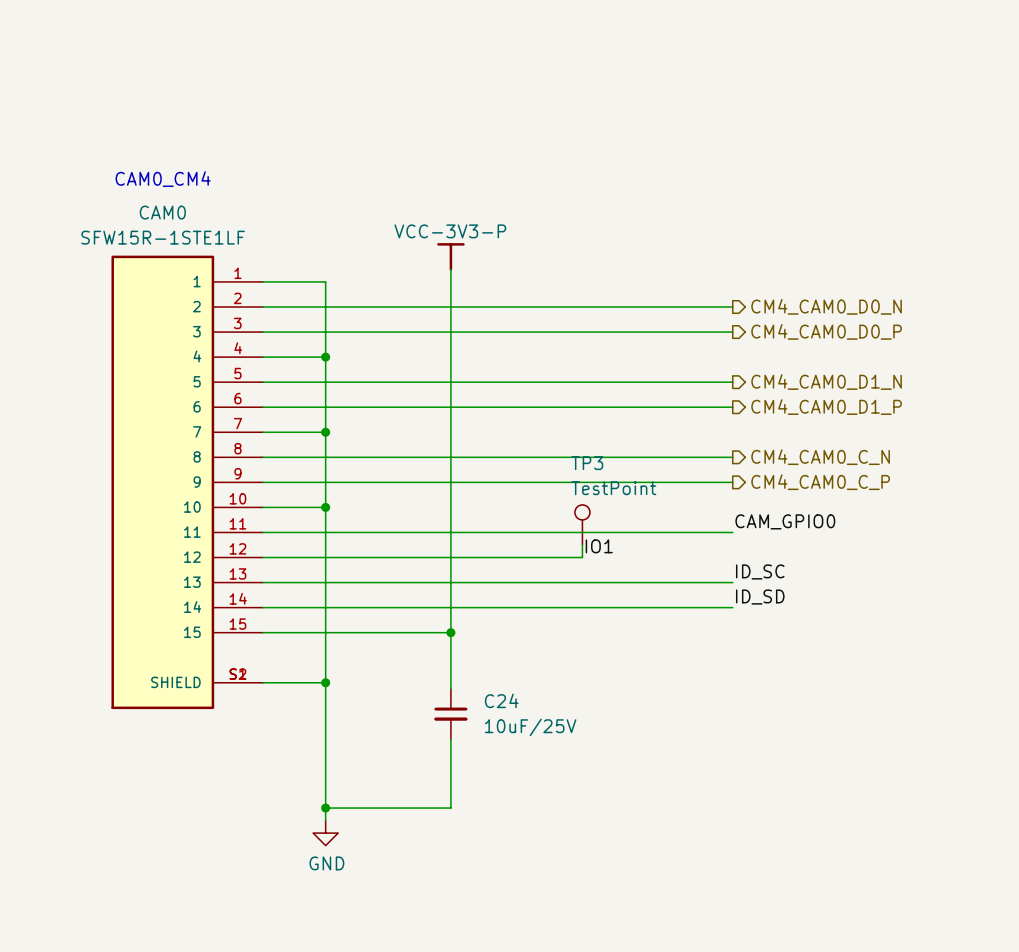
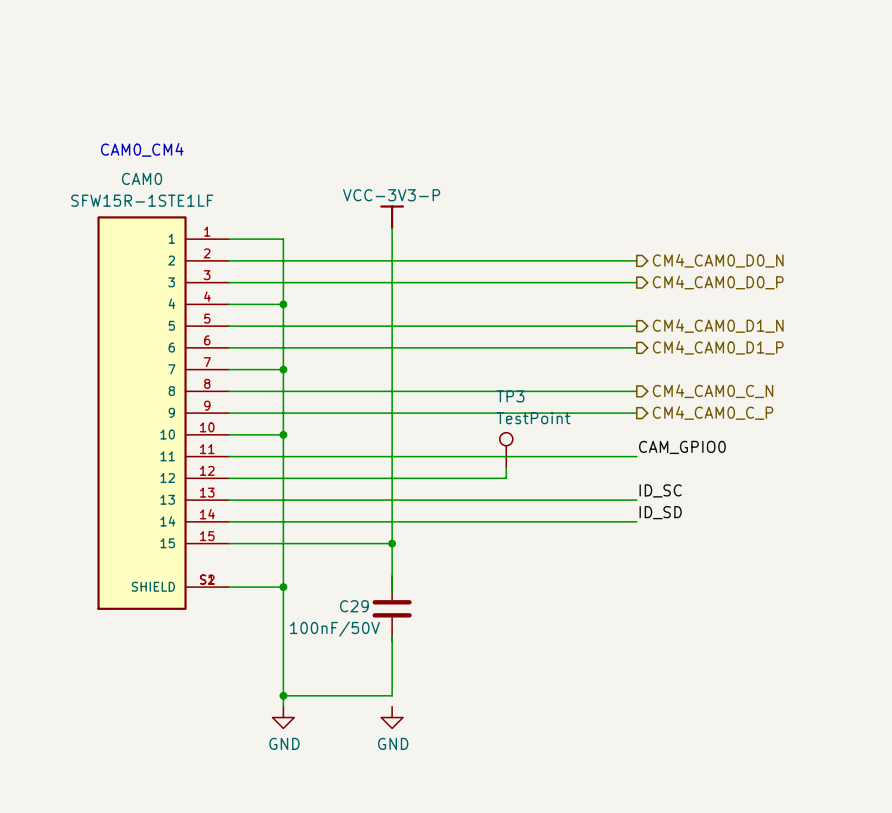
label: IO1 (599, 546) -> none
C29: none -> 100nF/50V (392, 608)
C24: 10uF/25V (450, 714) -> none
power symbol: none -> GND (392, 717)

